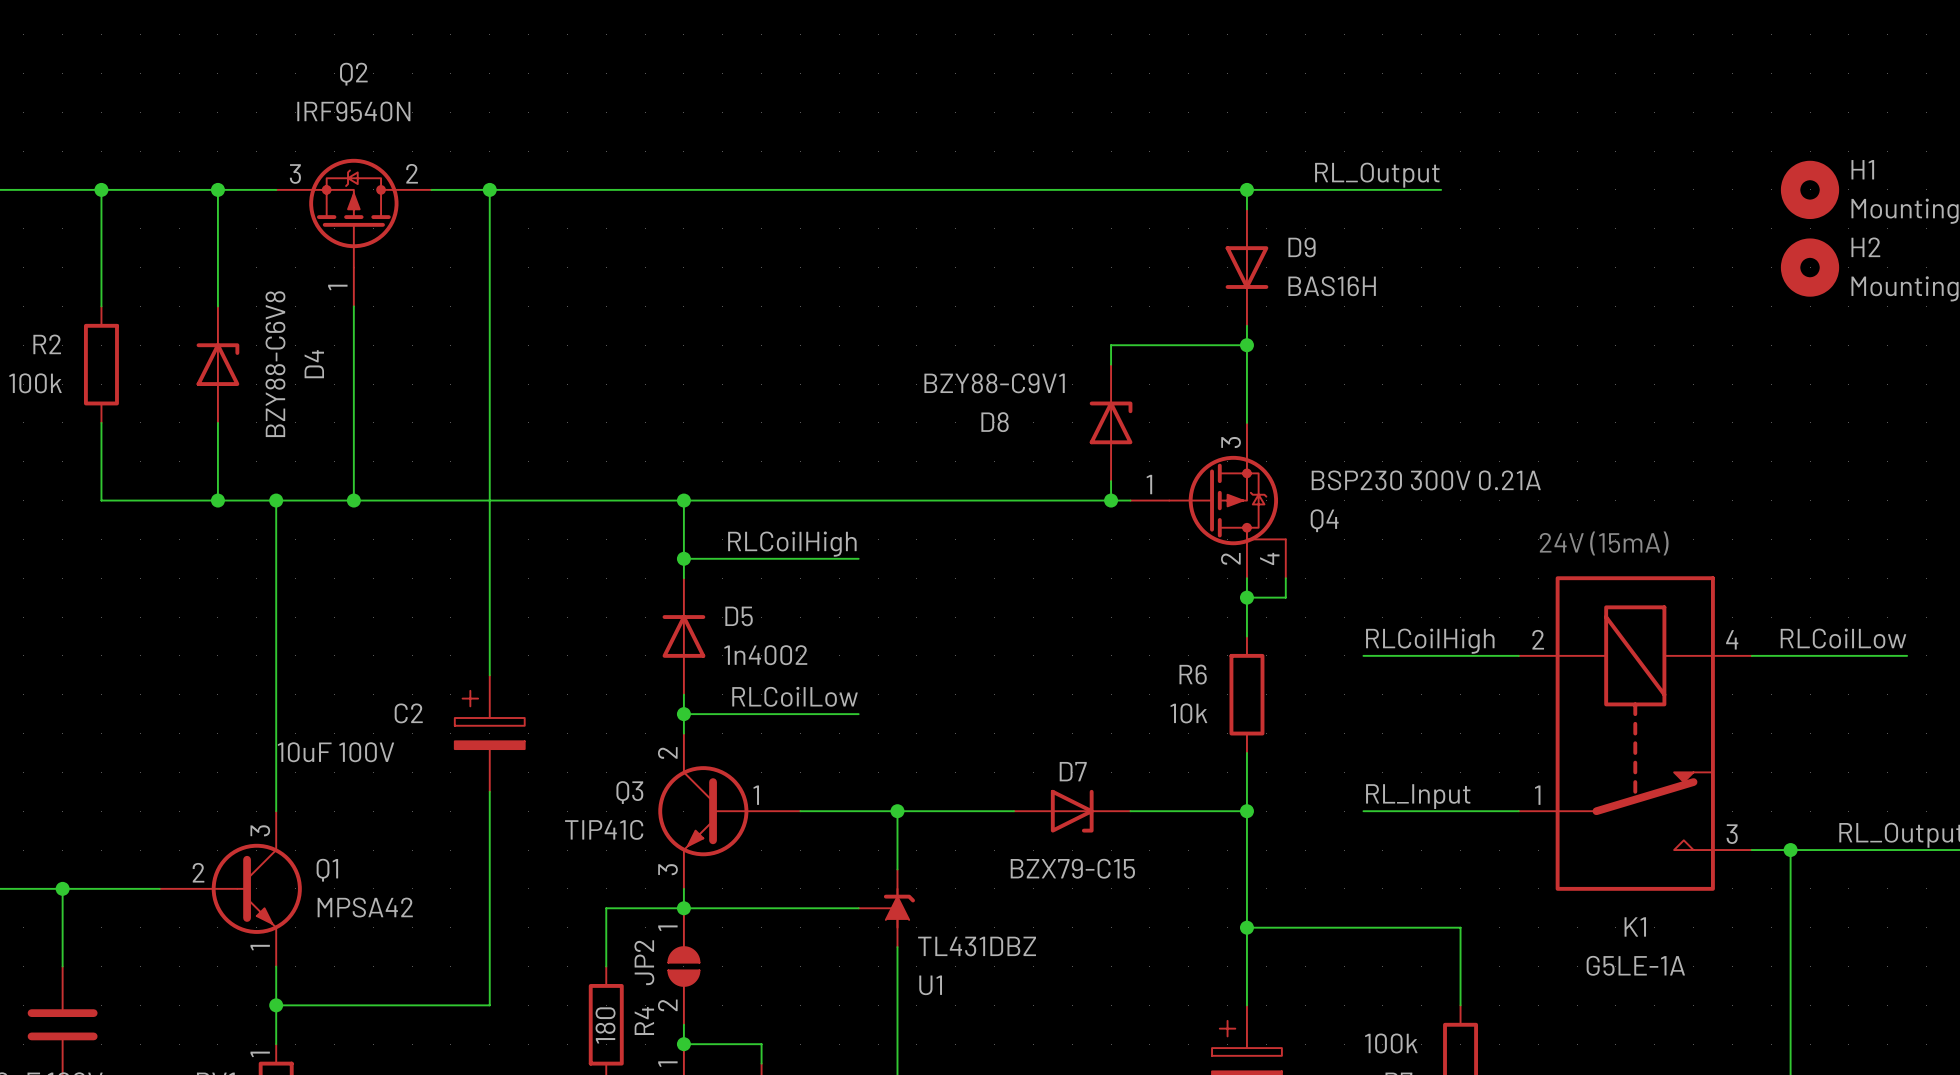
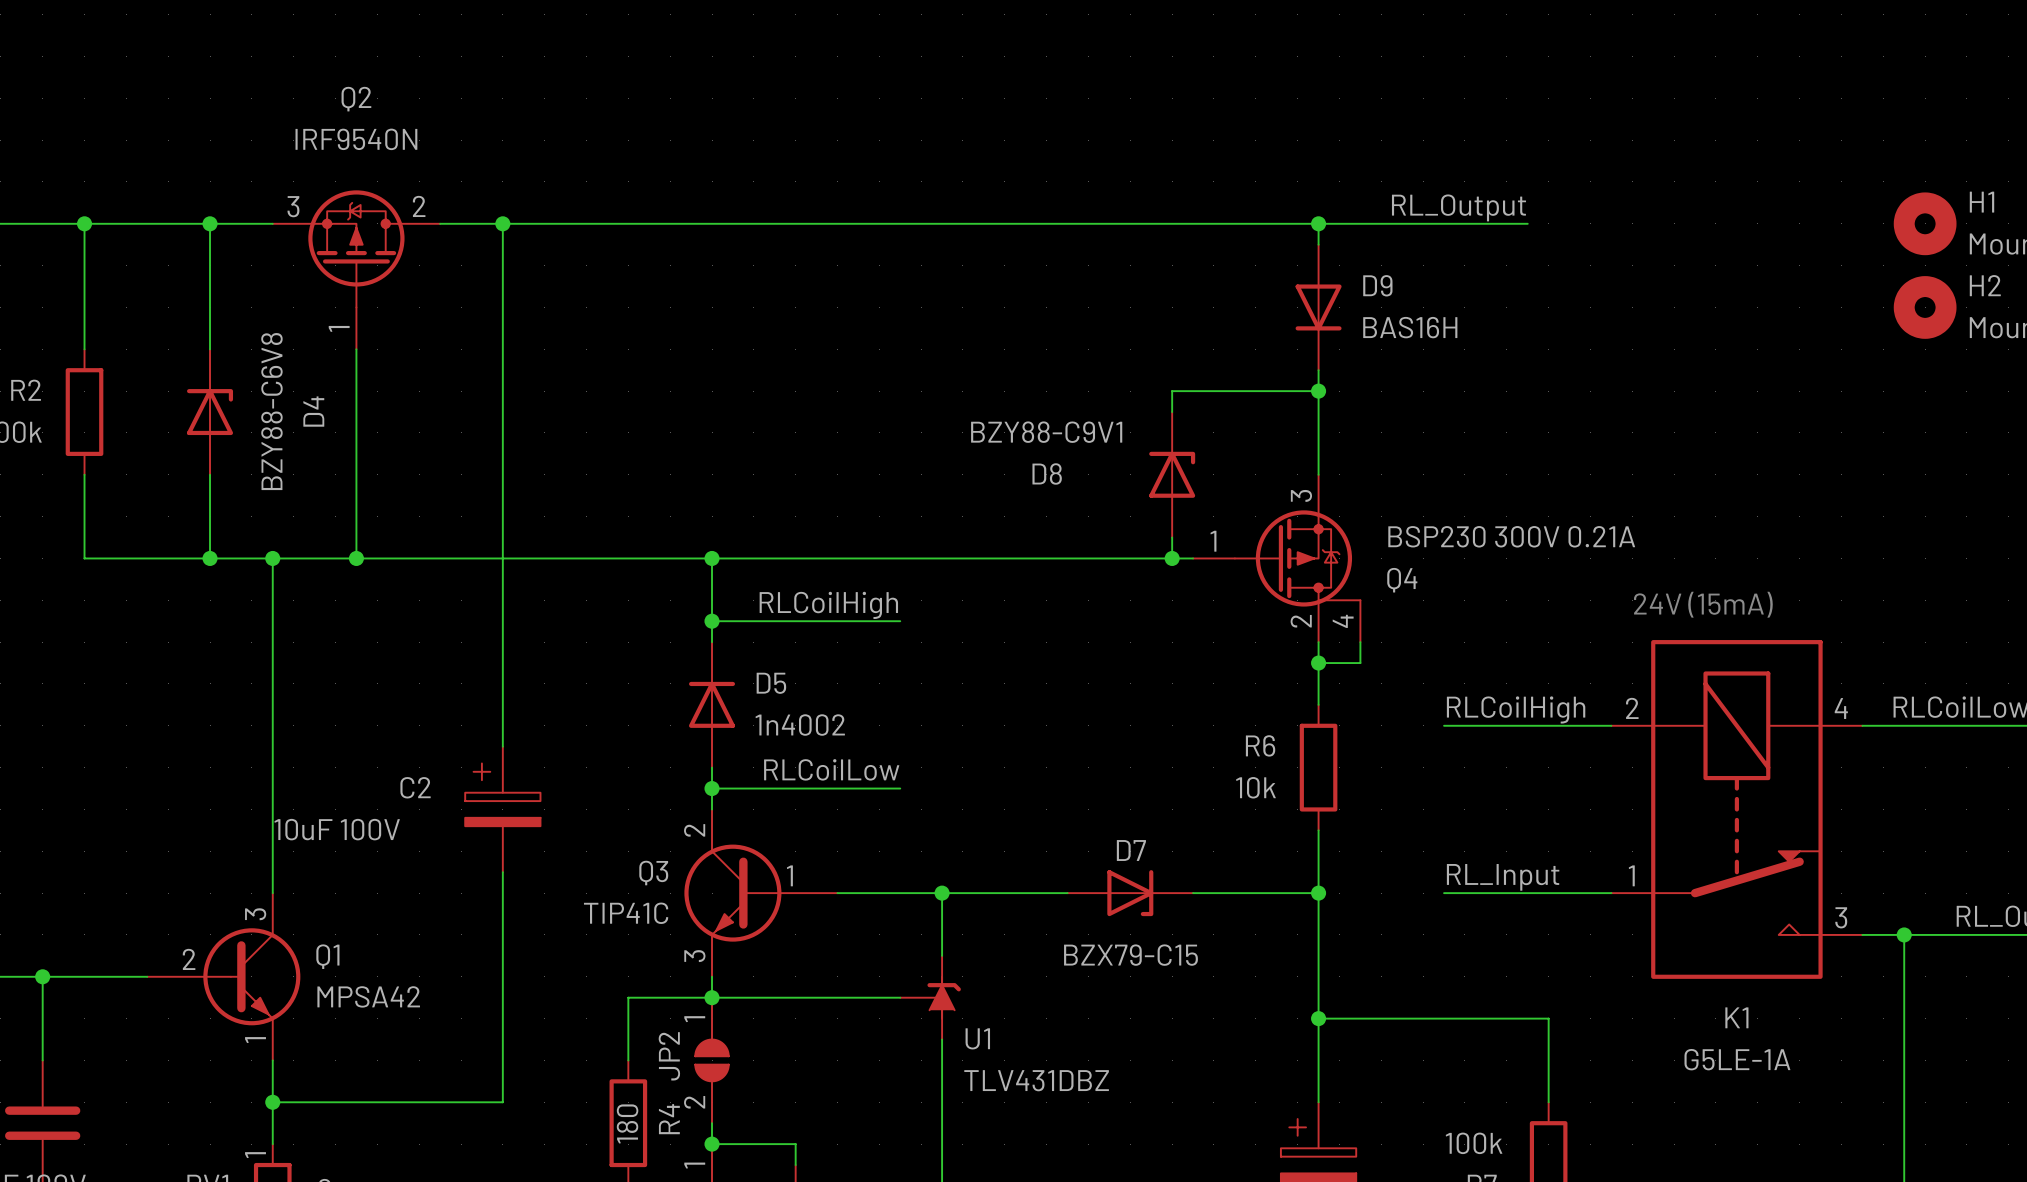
U1 value: TL431DBZ (977, 946) -> TLV431DBZ (1036, 1080)
U1 name position: U1 (930, 985) -> U1 (977, 1038)

